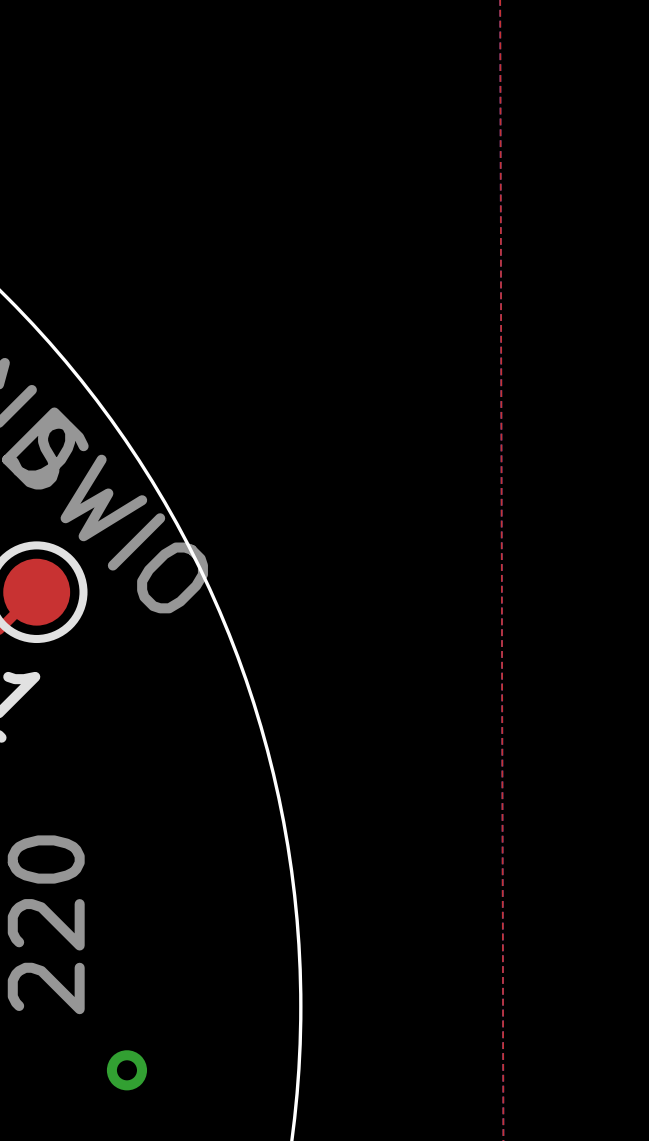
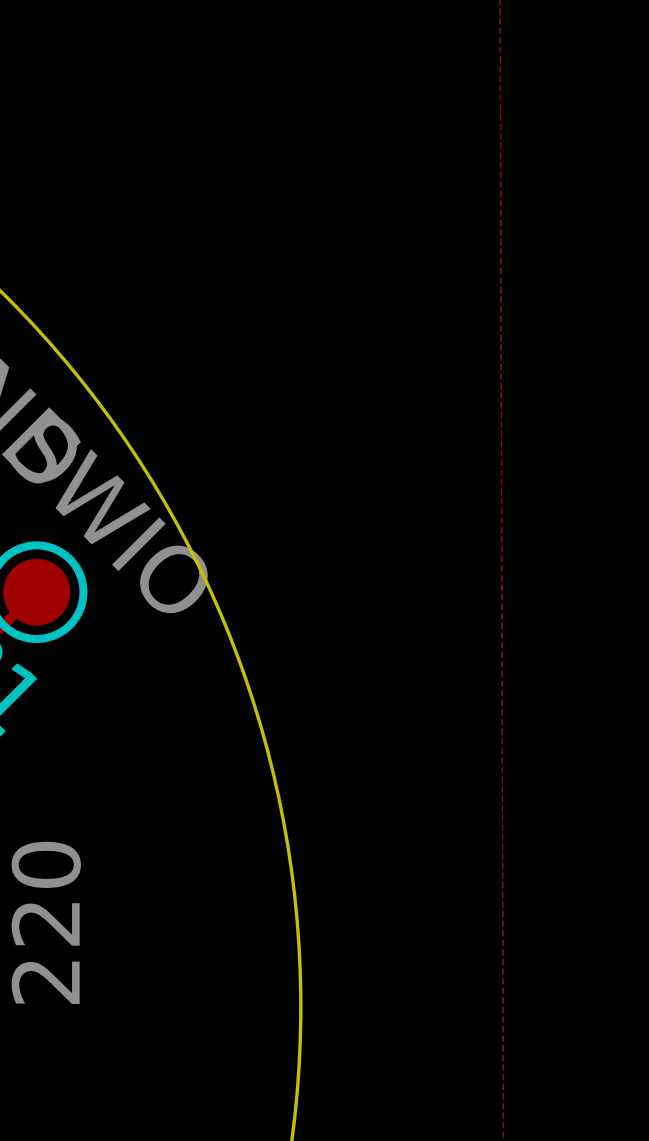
via: (126, 1070) -> none

